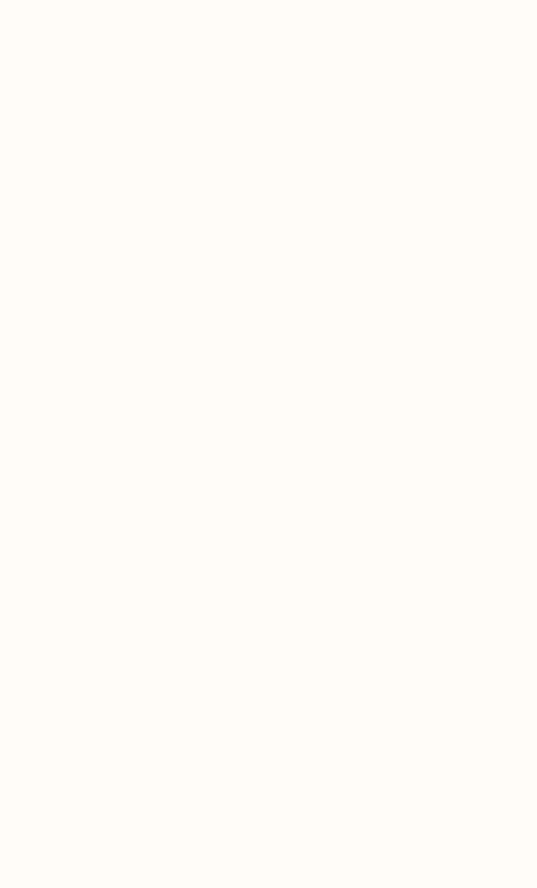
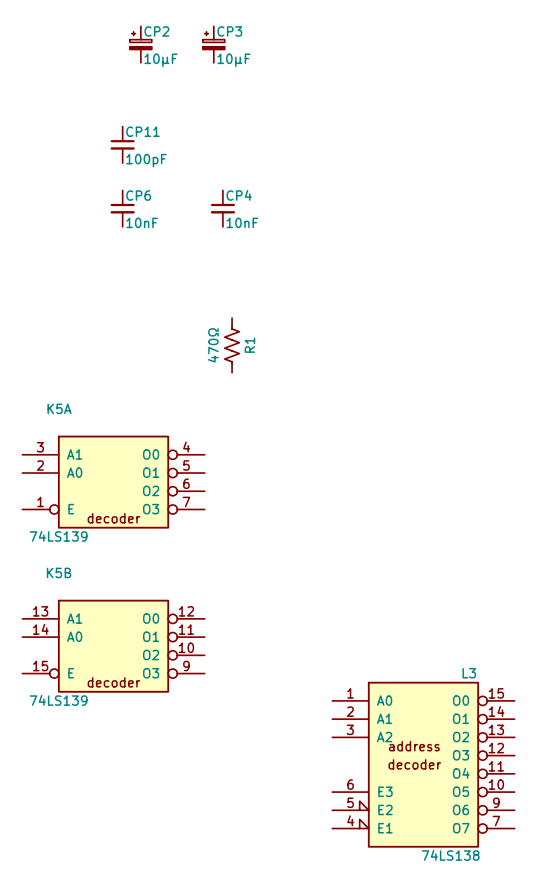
CP2: none -> 10µF (140, 44)
CP3: none -> 10µF (213, 44)
CP11: none -> 100pF (122, 144)
CP6: none -> 10nF (122, 208)
CP4: none -> 10nF (222, 208)
R1: none -> 470Ω (232, 345)
K5A: none -> 74LS139 (113, 482)
K5B: none -> 74LS139 (113, 646)
L3: none -> 74LS138 (423, 764)

